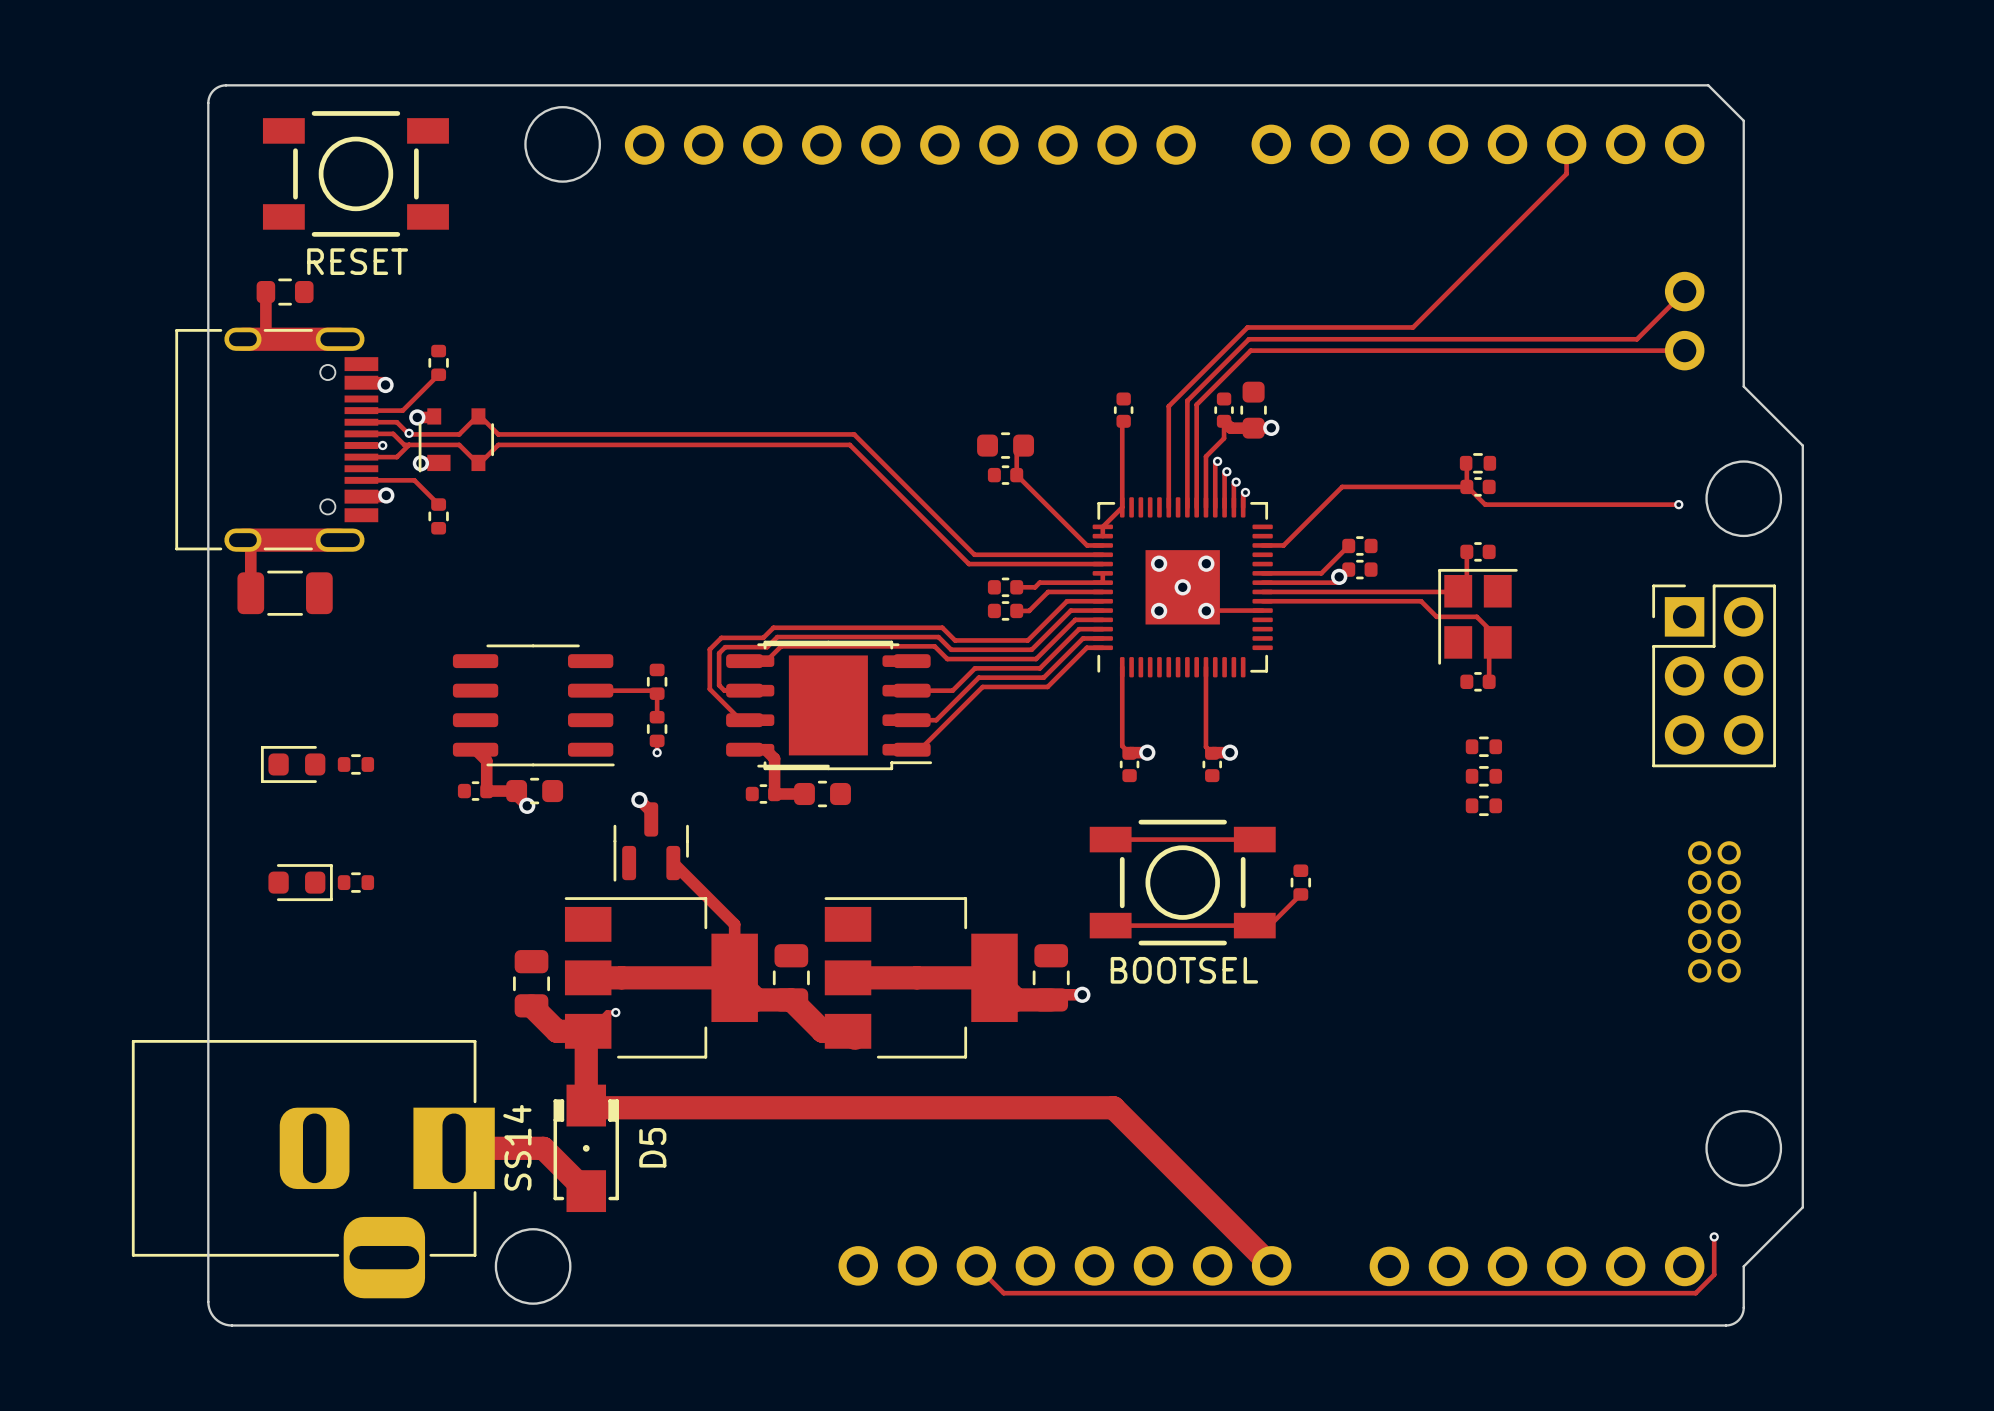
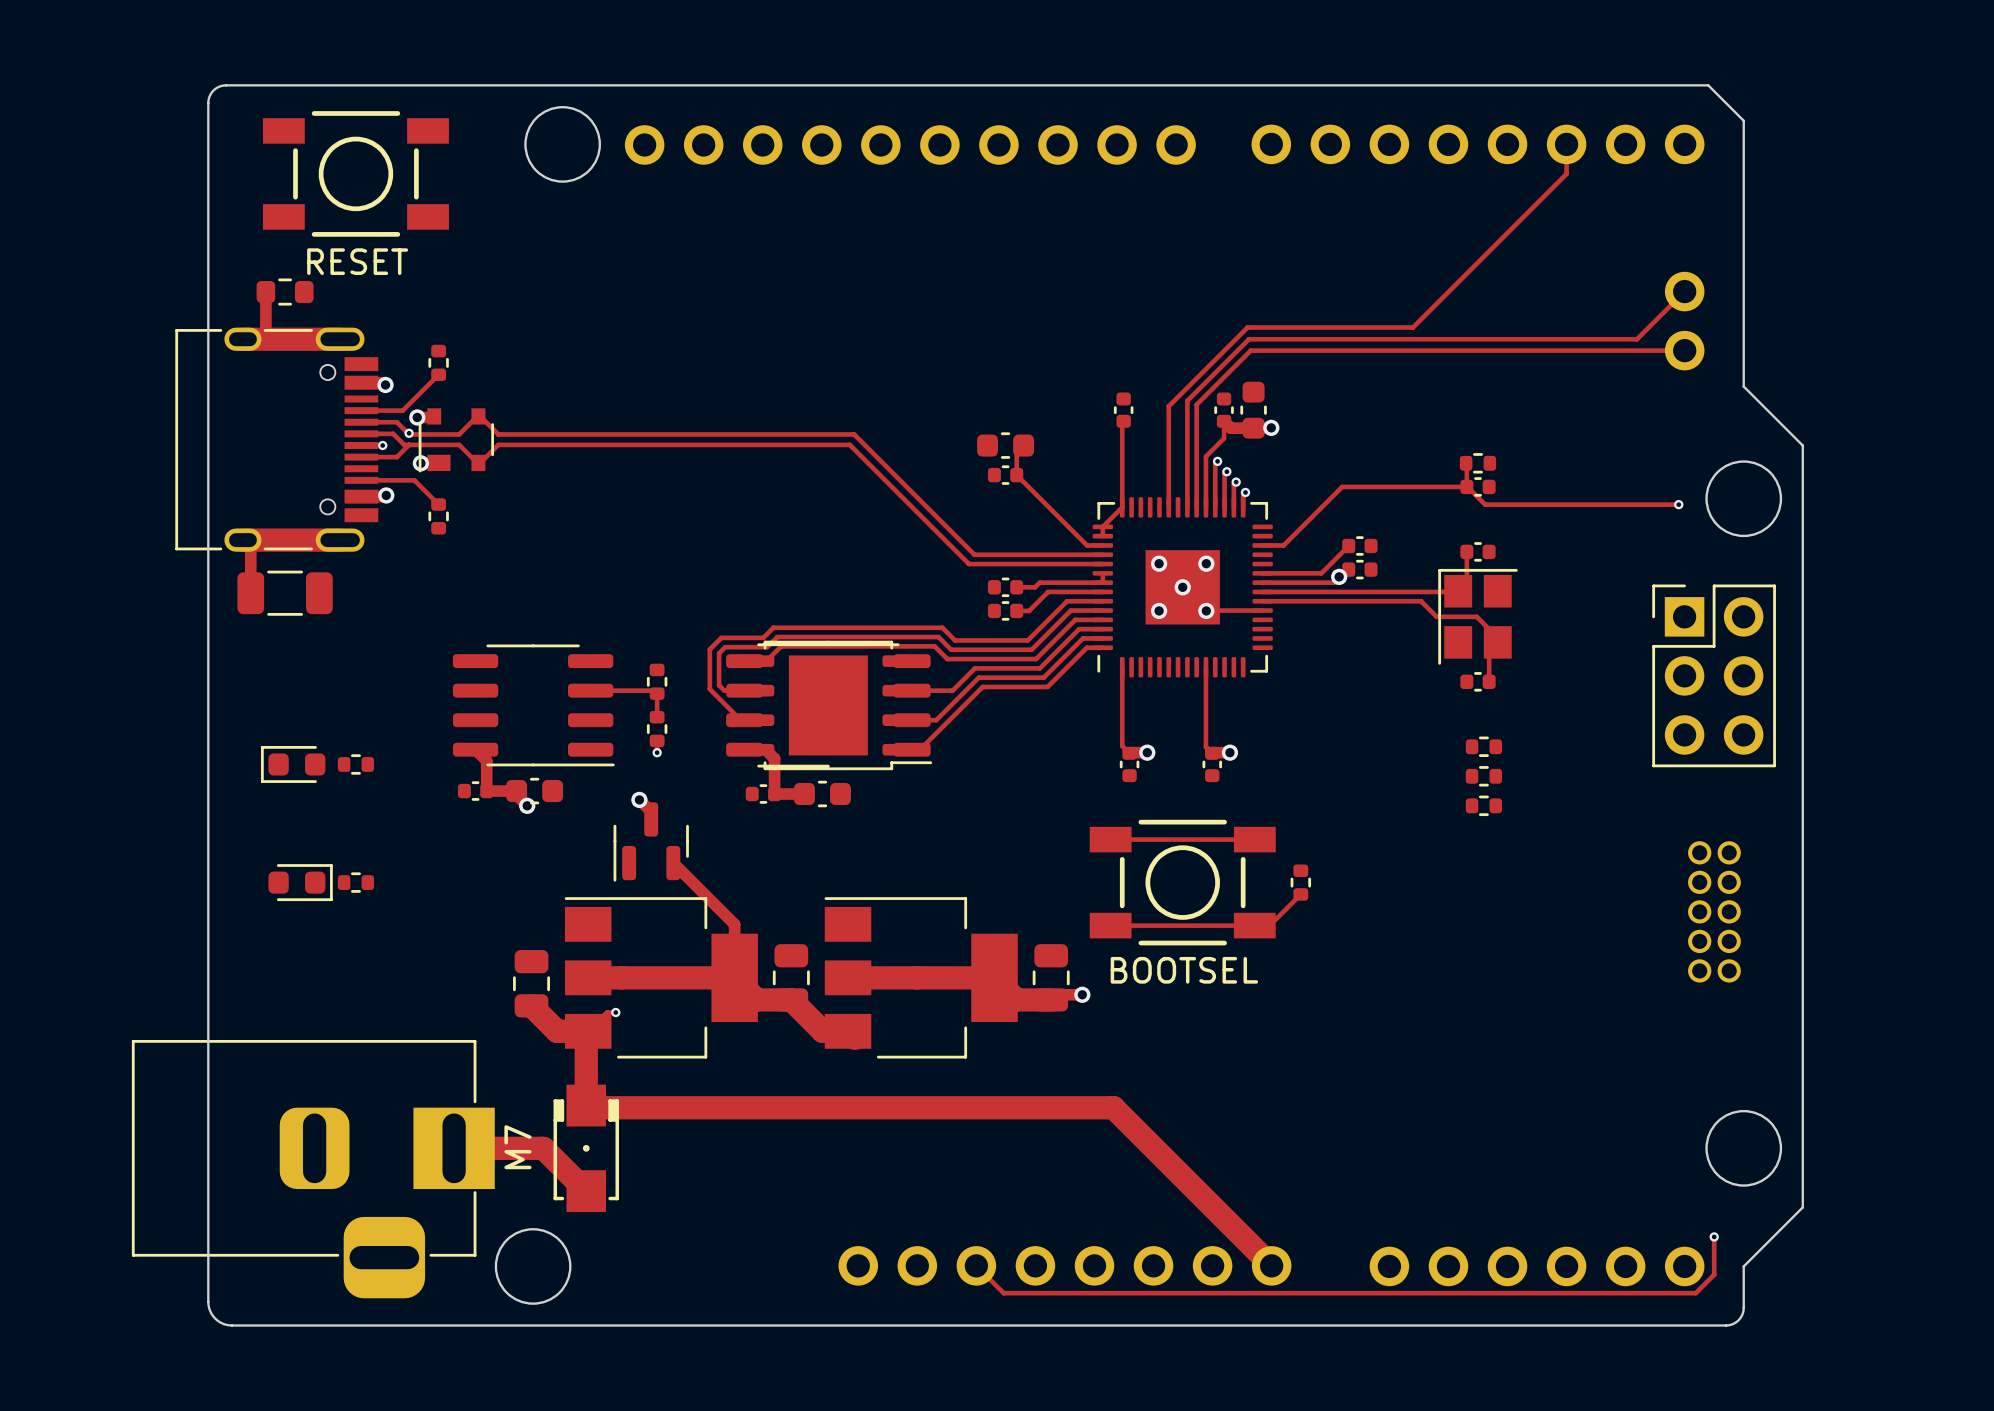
D5 value: SS14 (517, 1147) -> M7 (517, 1147)
D5 name: D5 (652, 1147) -> none

